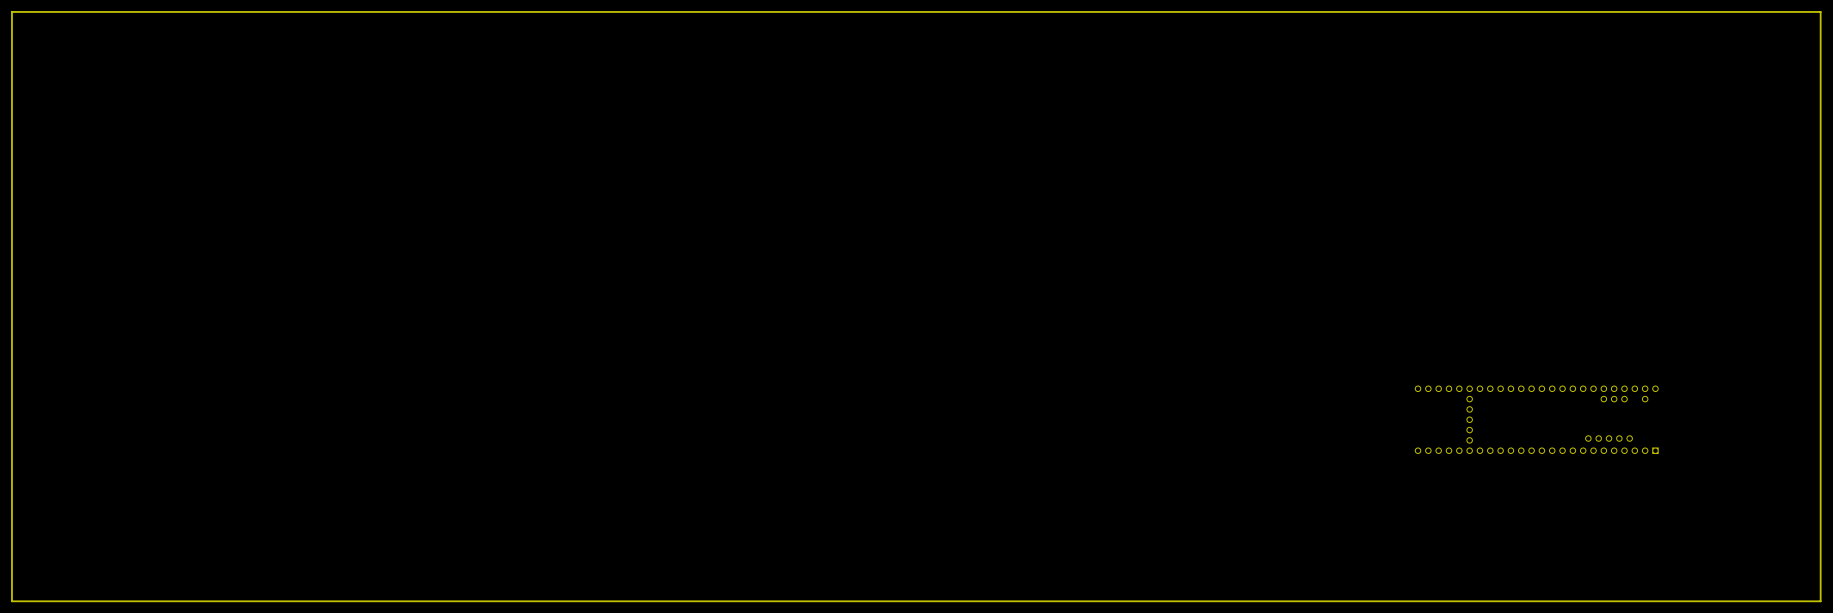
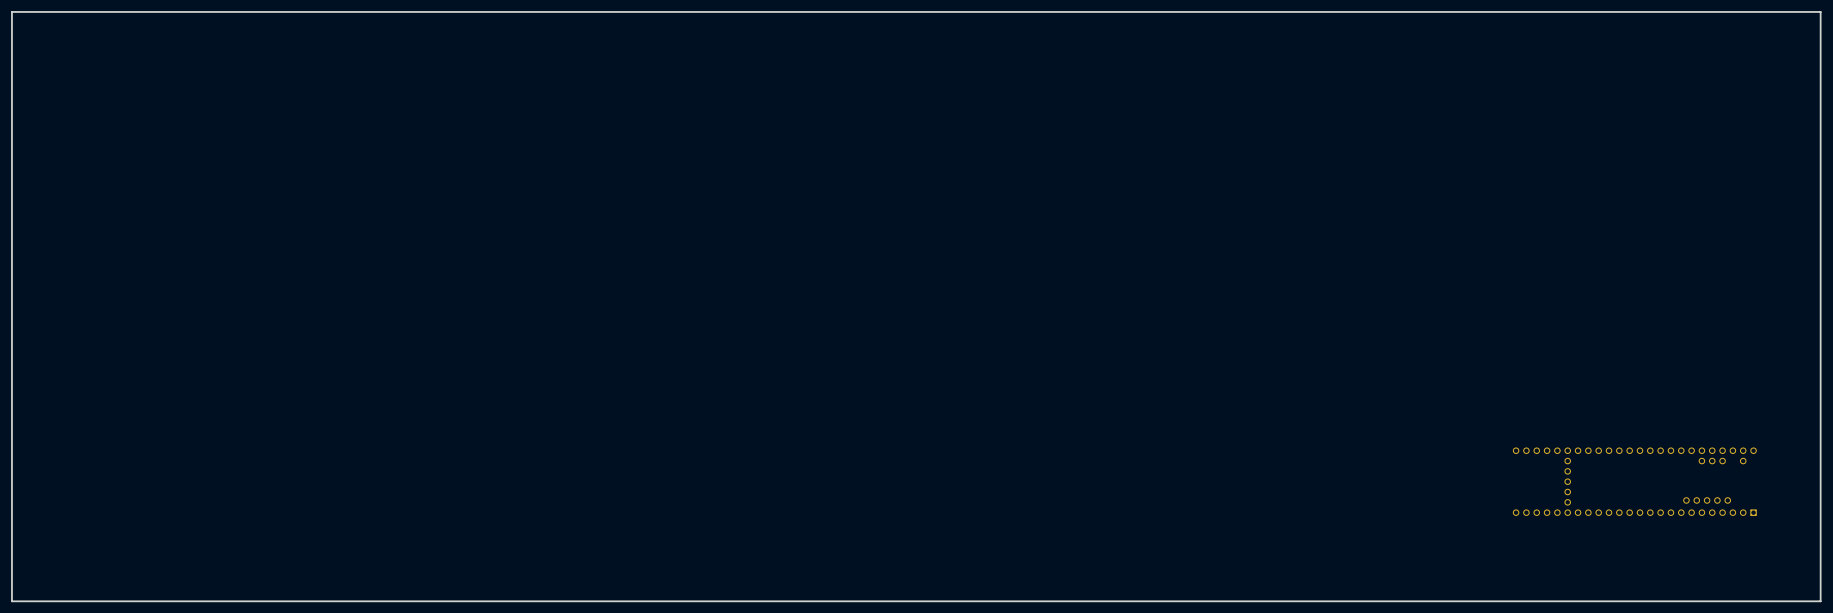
part: (1536, 419) -> none
part: none -> (1634, 481)

